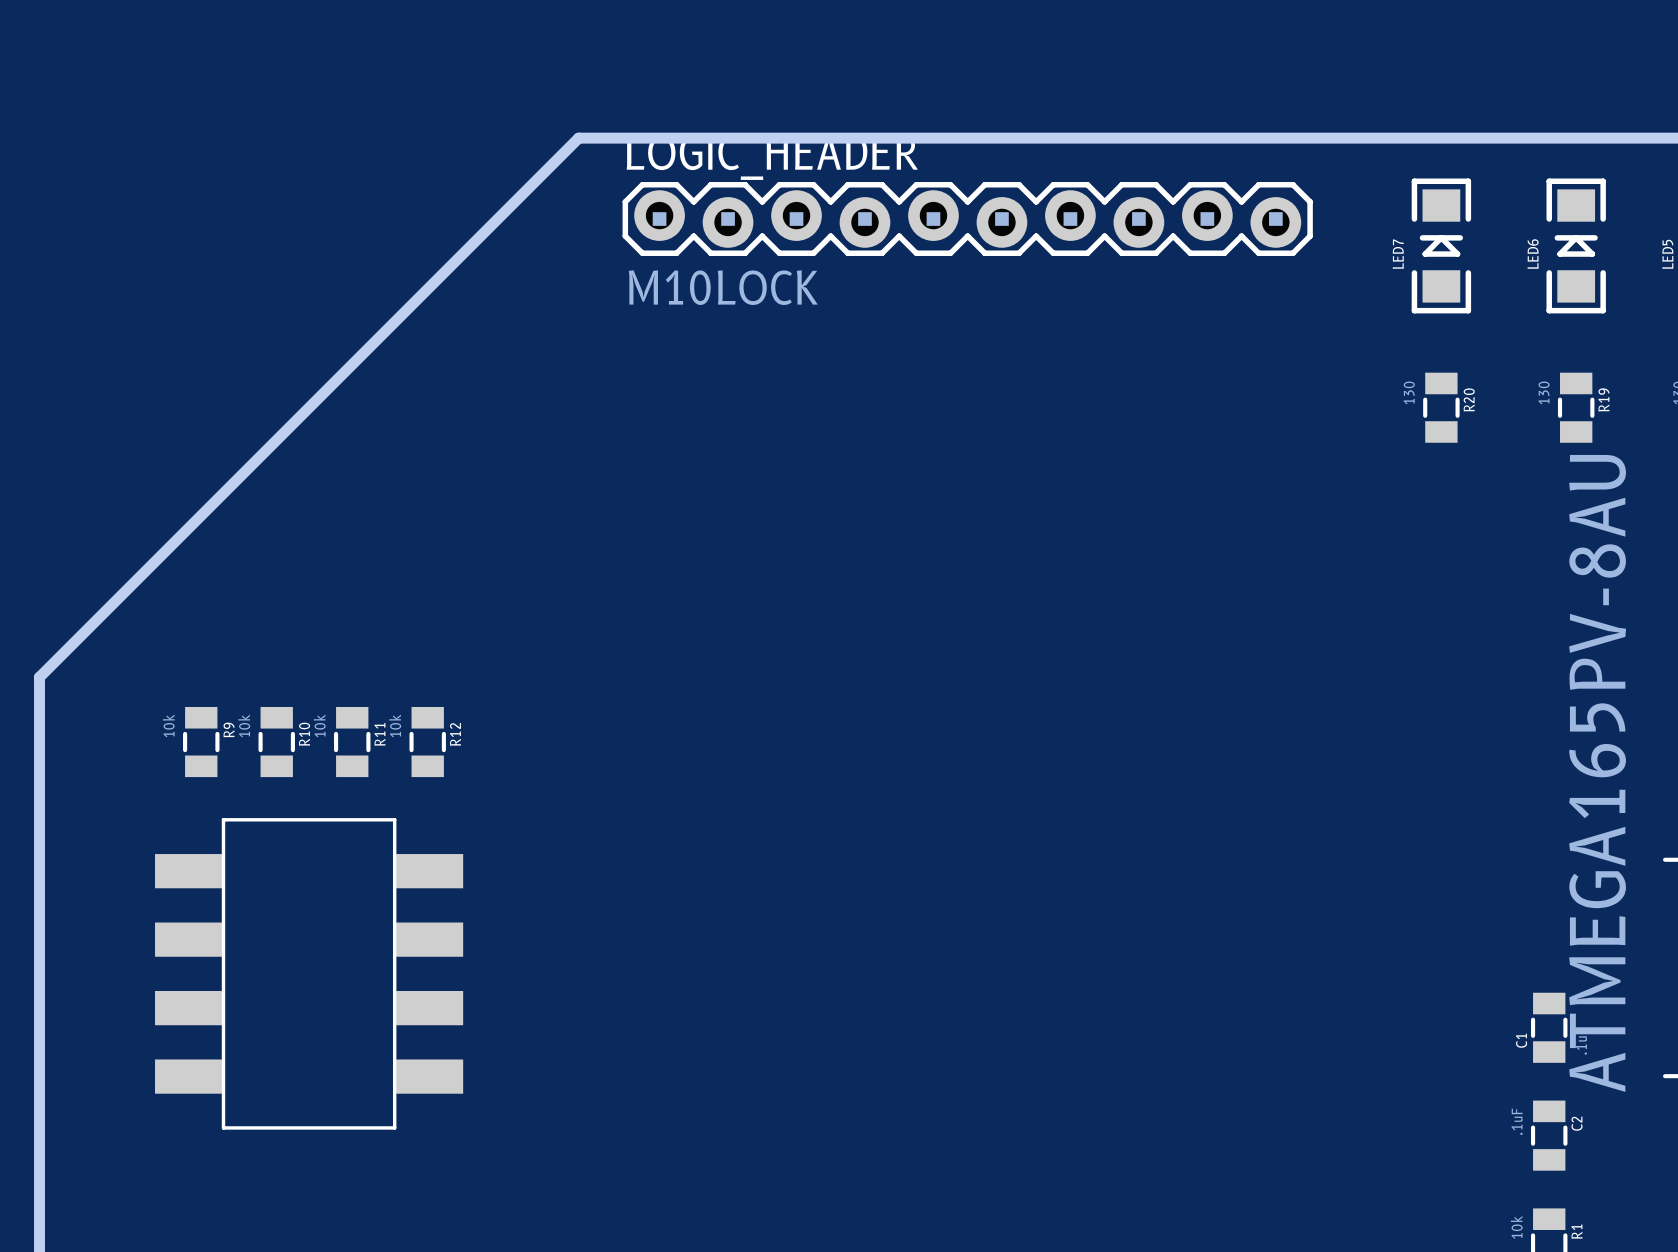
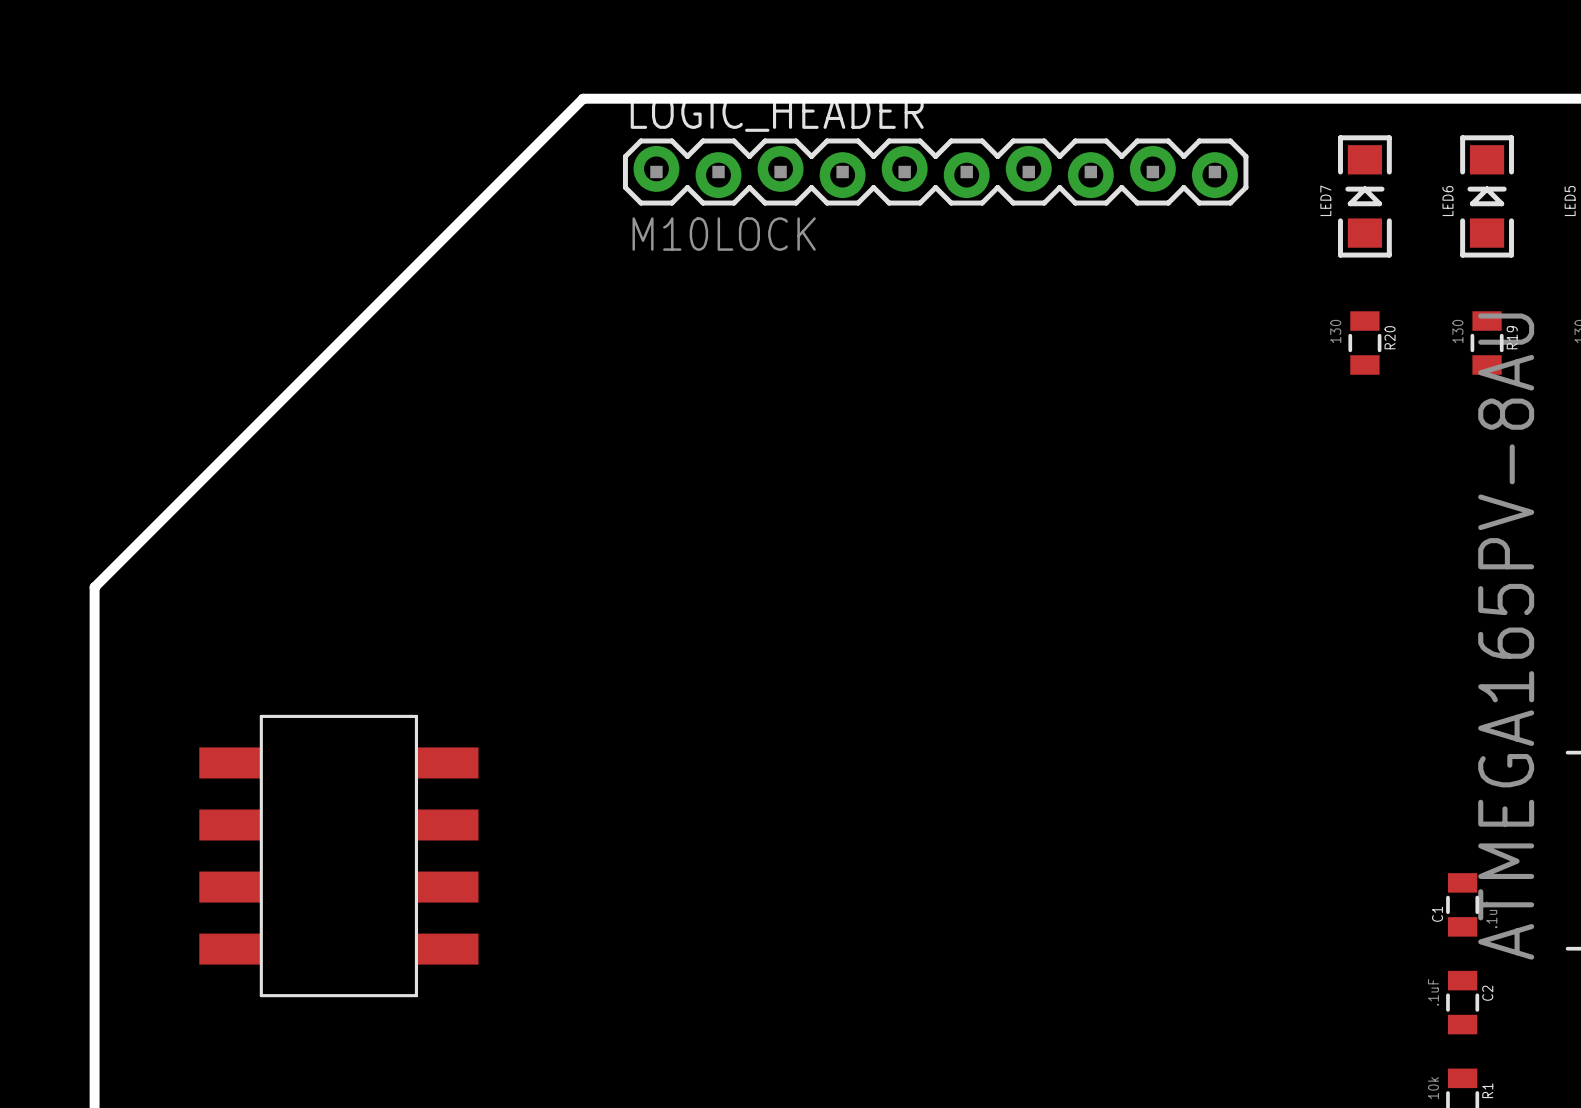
R9: 10k (201, 742) -> none
R10: 10k (276, 742) -> none
R11: 10k (352, 742) -> none
R12: 10k (427, 742) -> none

